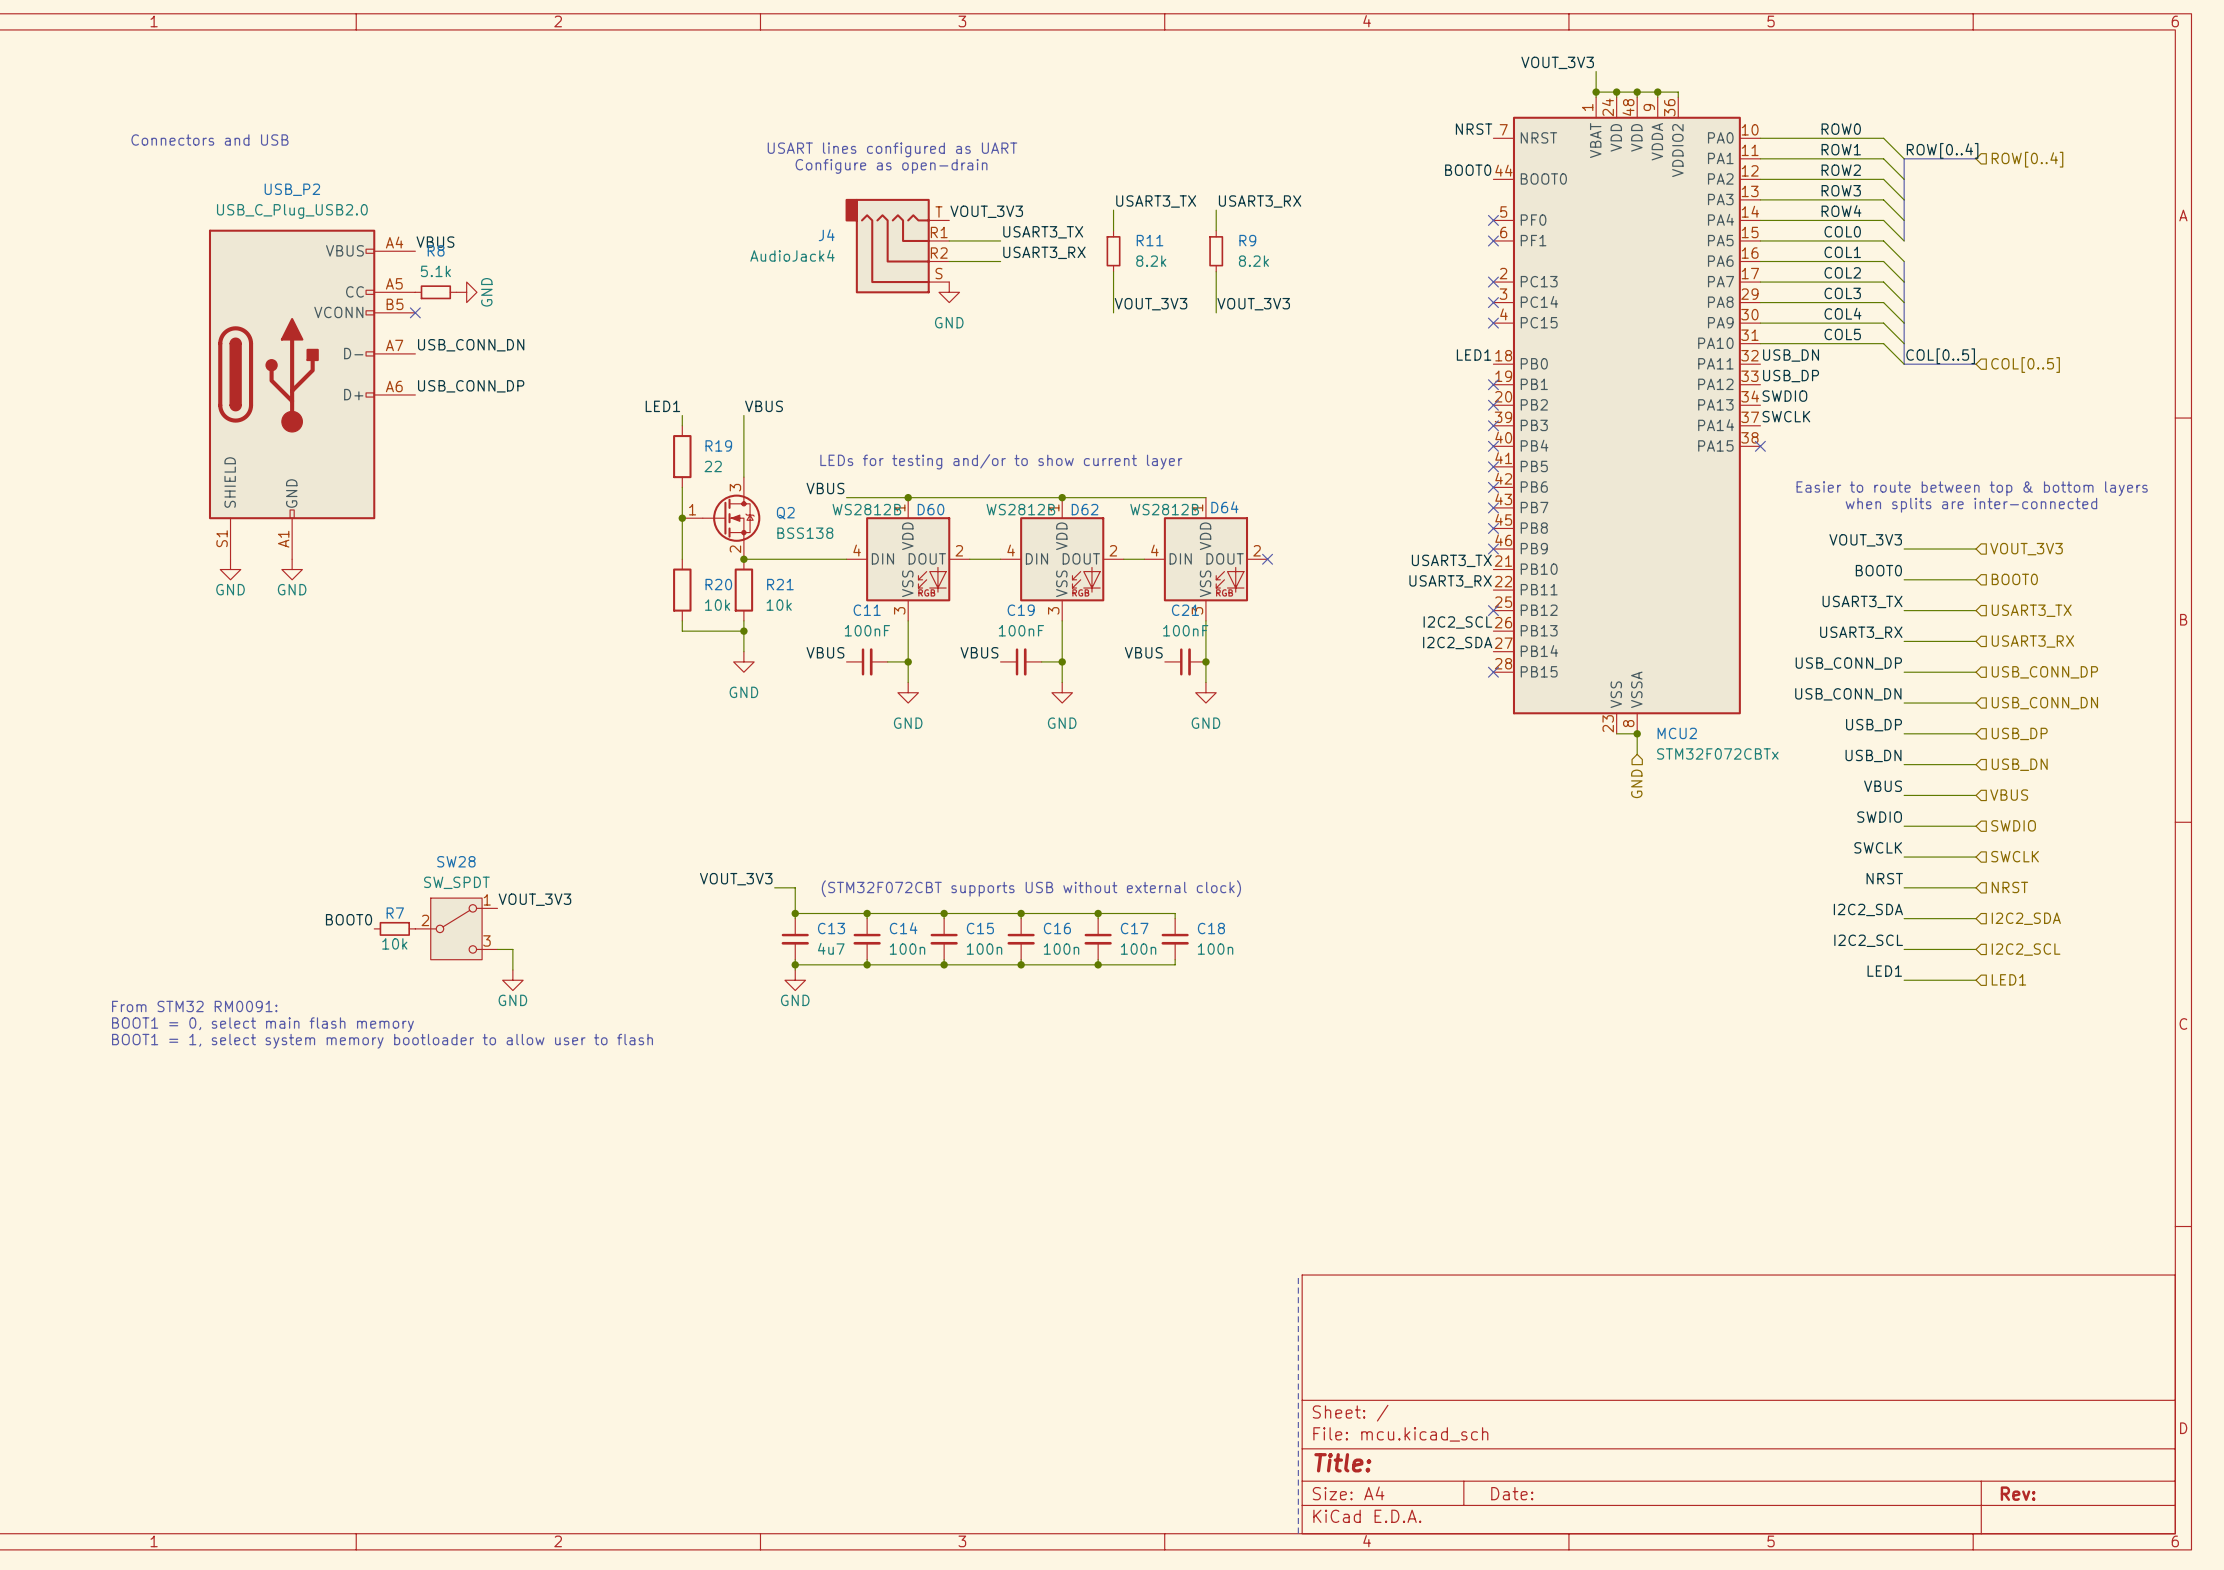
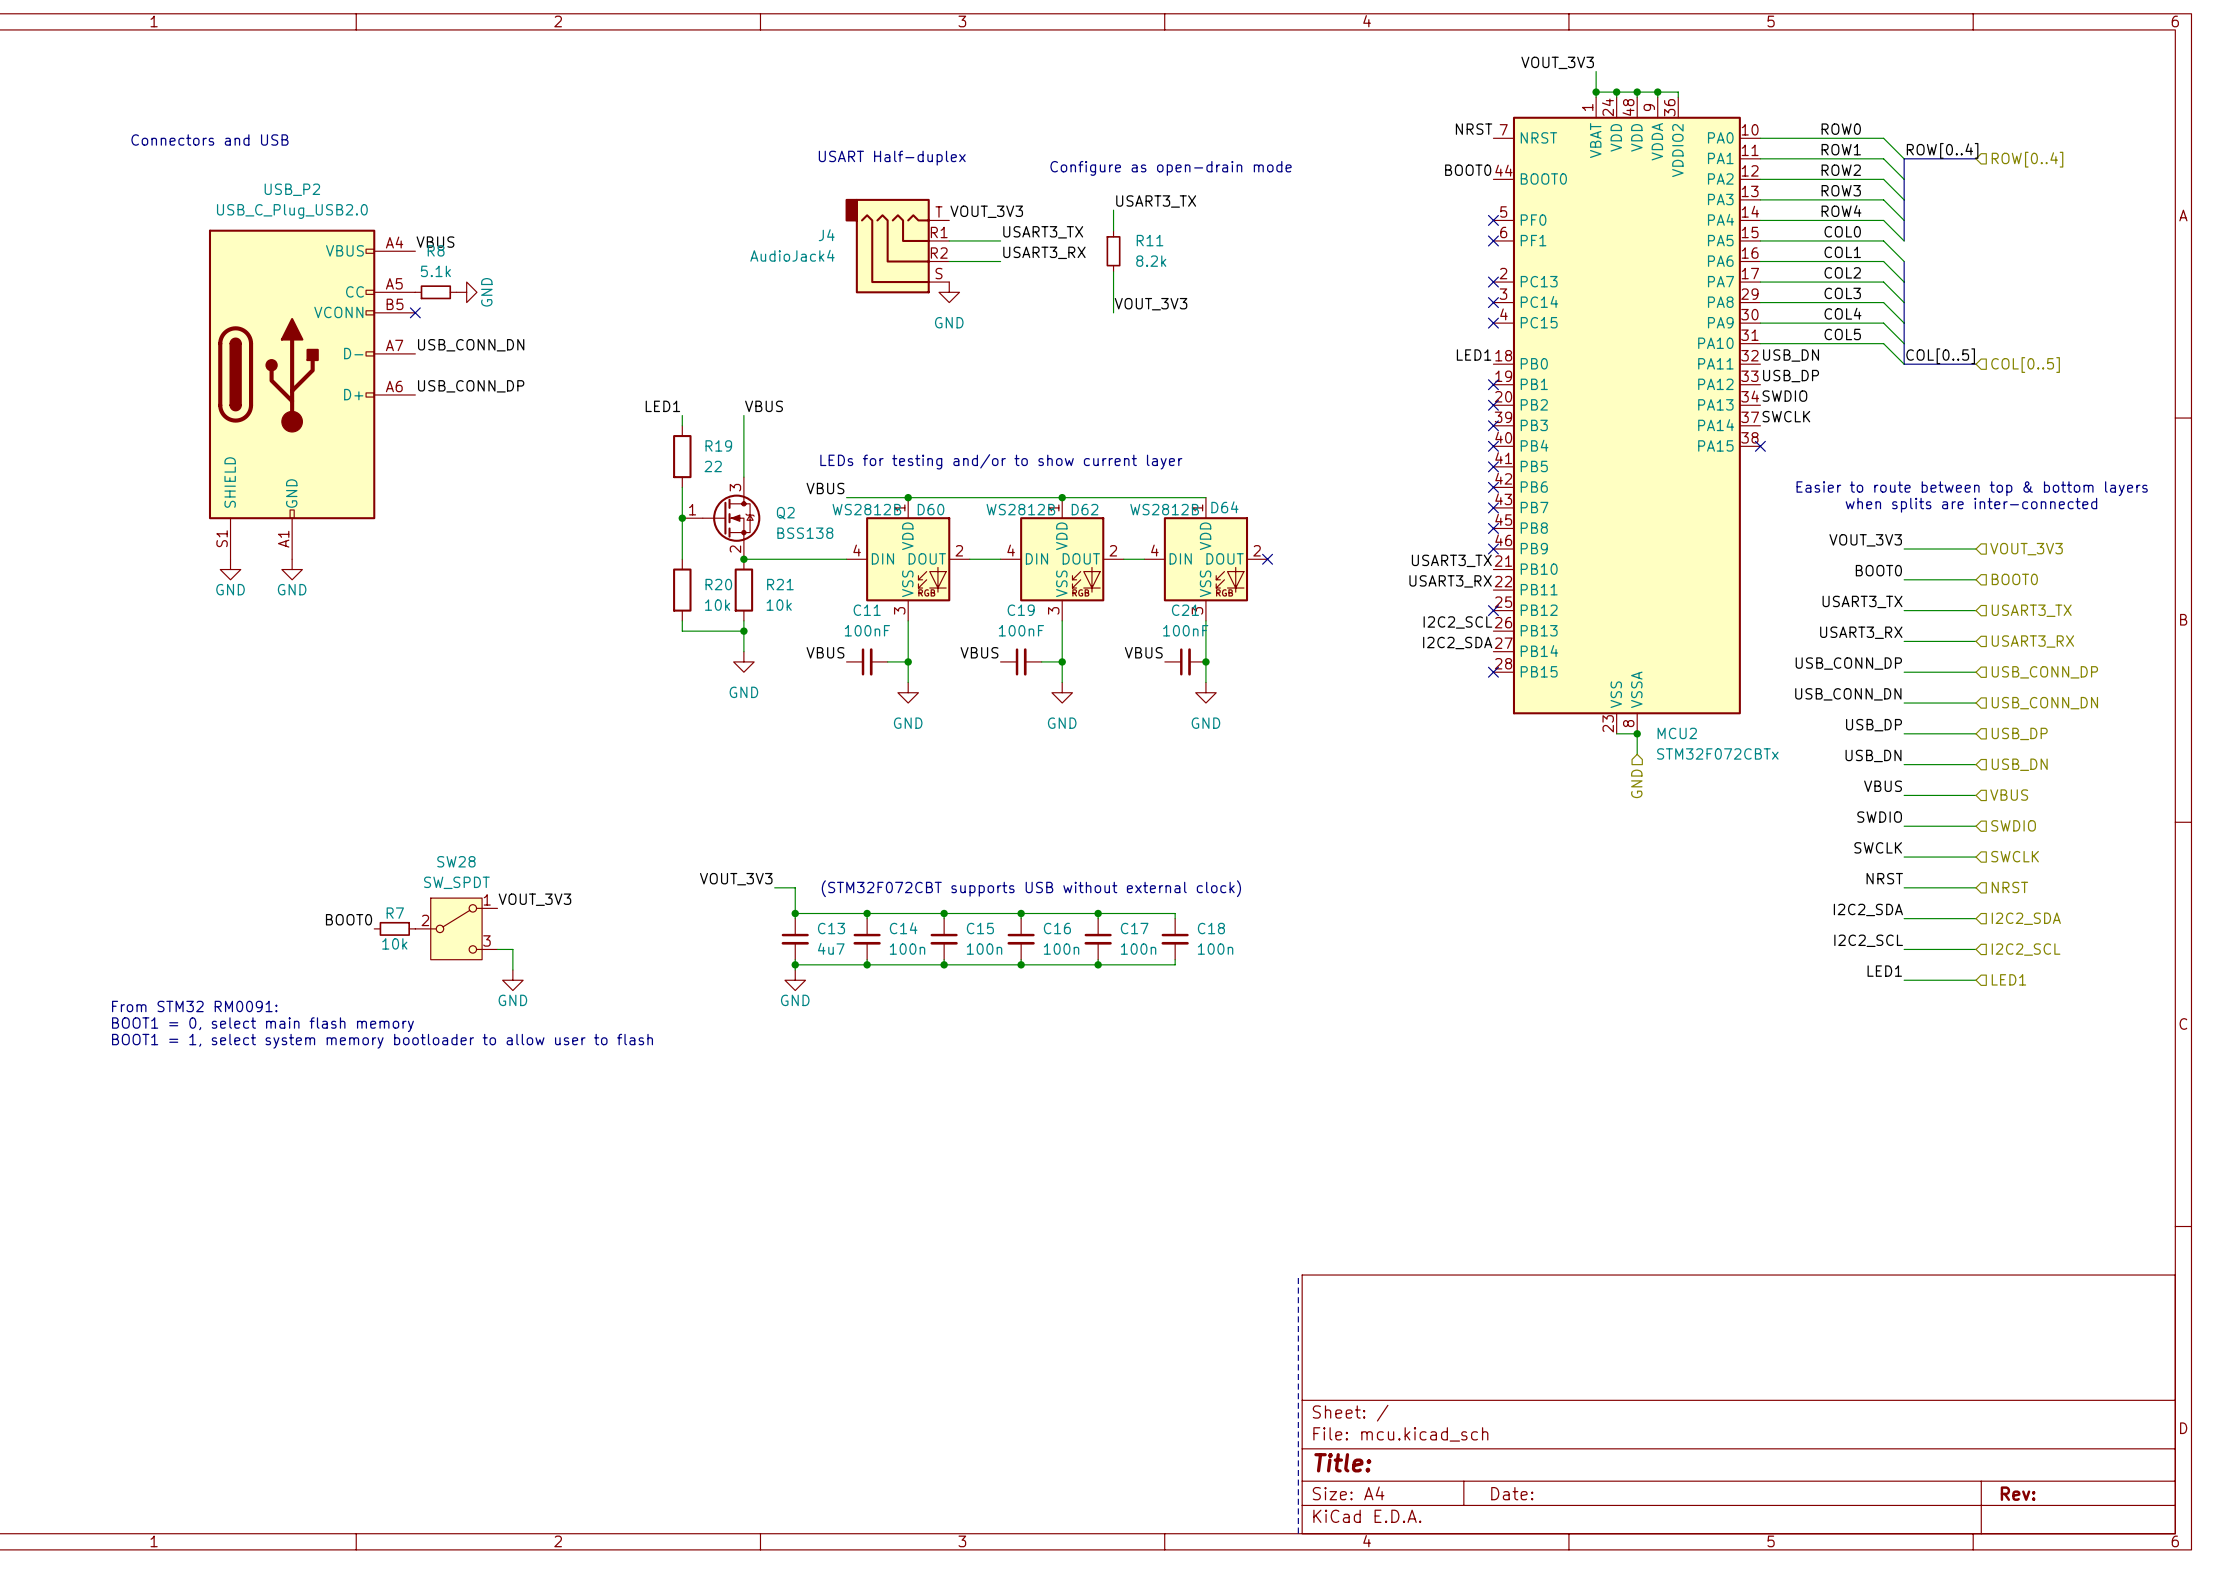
text: USART lines configured as UART (892, 149) -> none
text: none -> USART Half-duplex (892, 158)
text: Configure as open-drain (891, 166) -> none
text: none -> Configure as open-drain mode (1171, 168)
label: USART3_RX (1260, 201) -> none
wire: (1216, 210) (1216, 230) -> none
R9: 8.2k (1216, 251) -> none
wire: (1216, 271) (1216, 312) -> none
label: VOUT_3V3 (1253, 304) -> none

